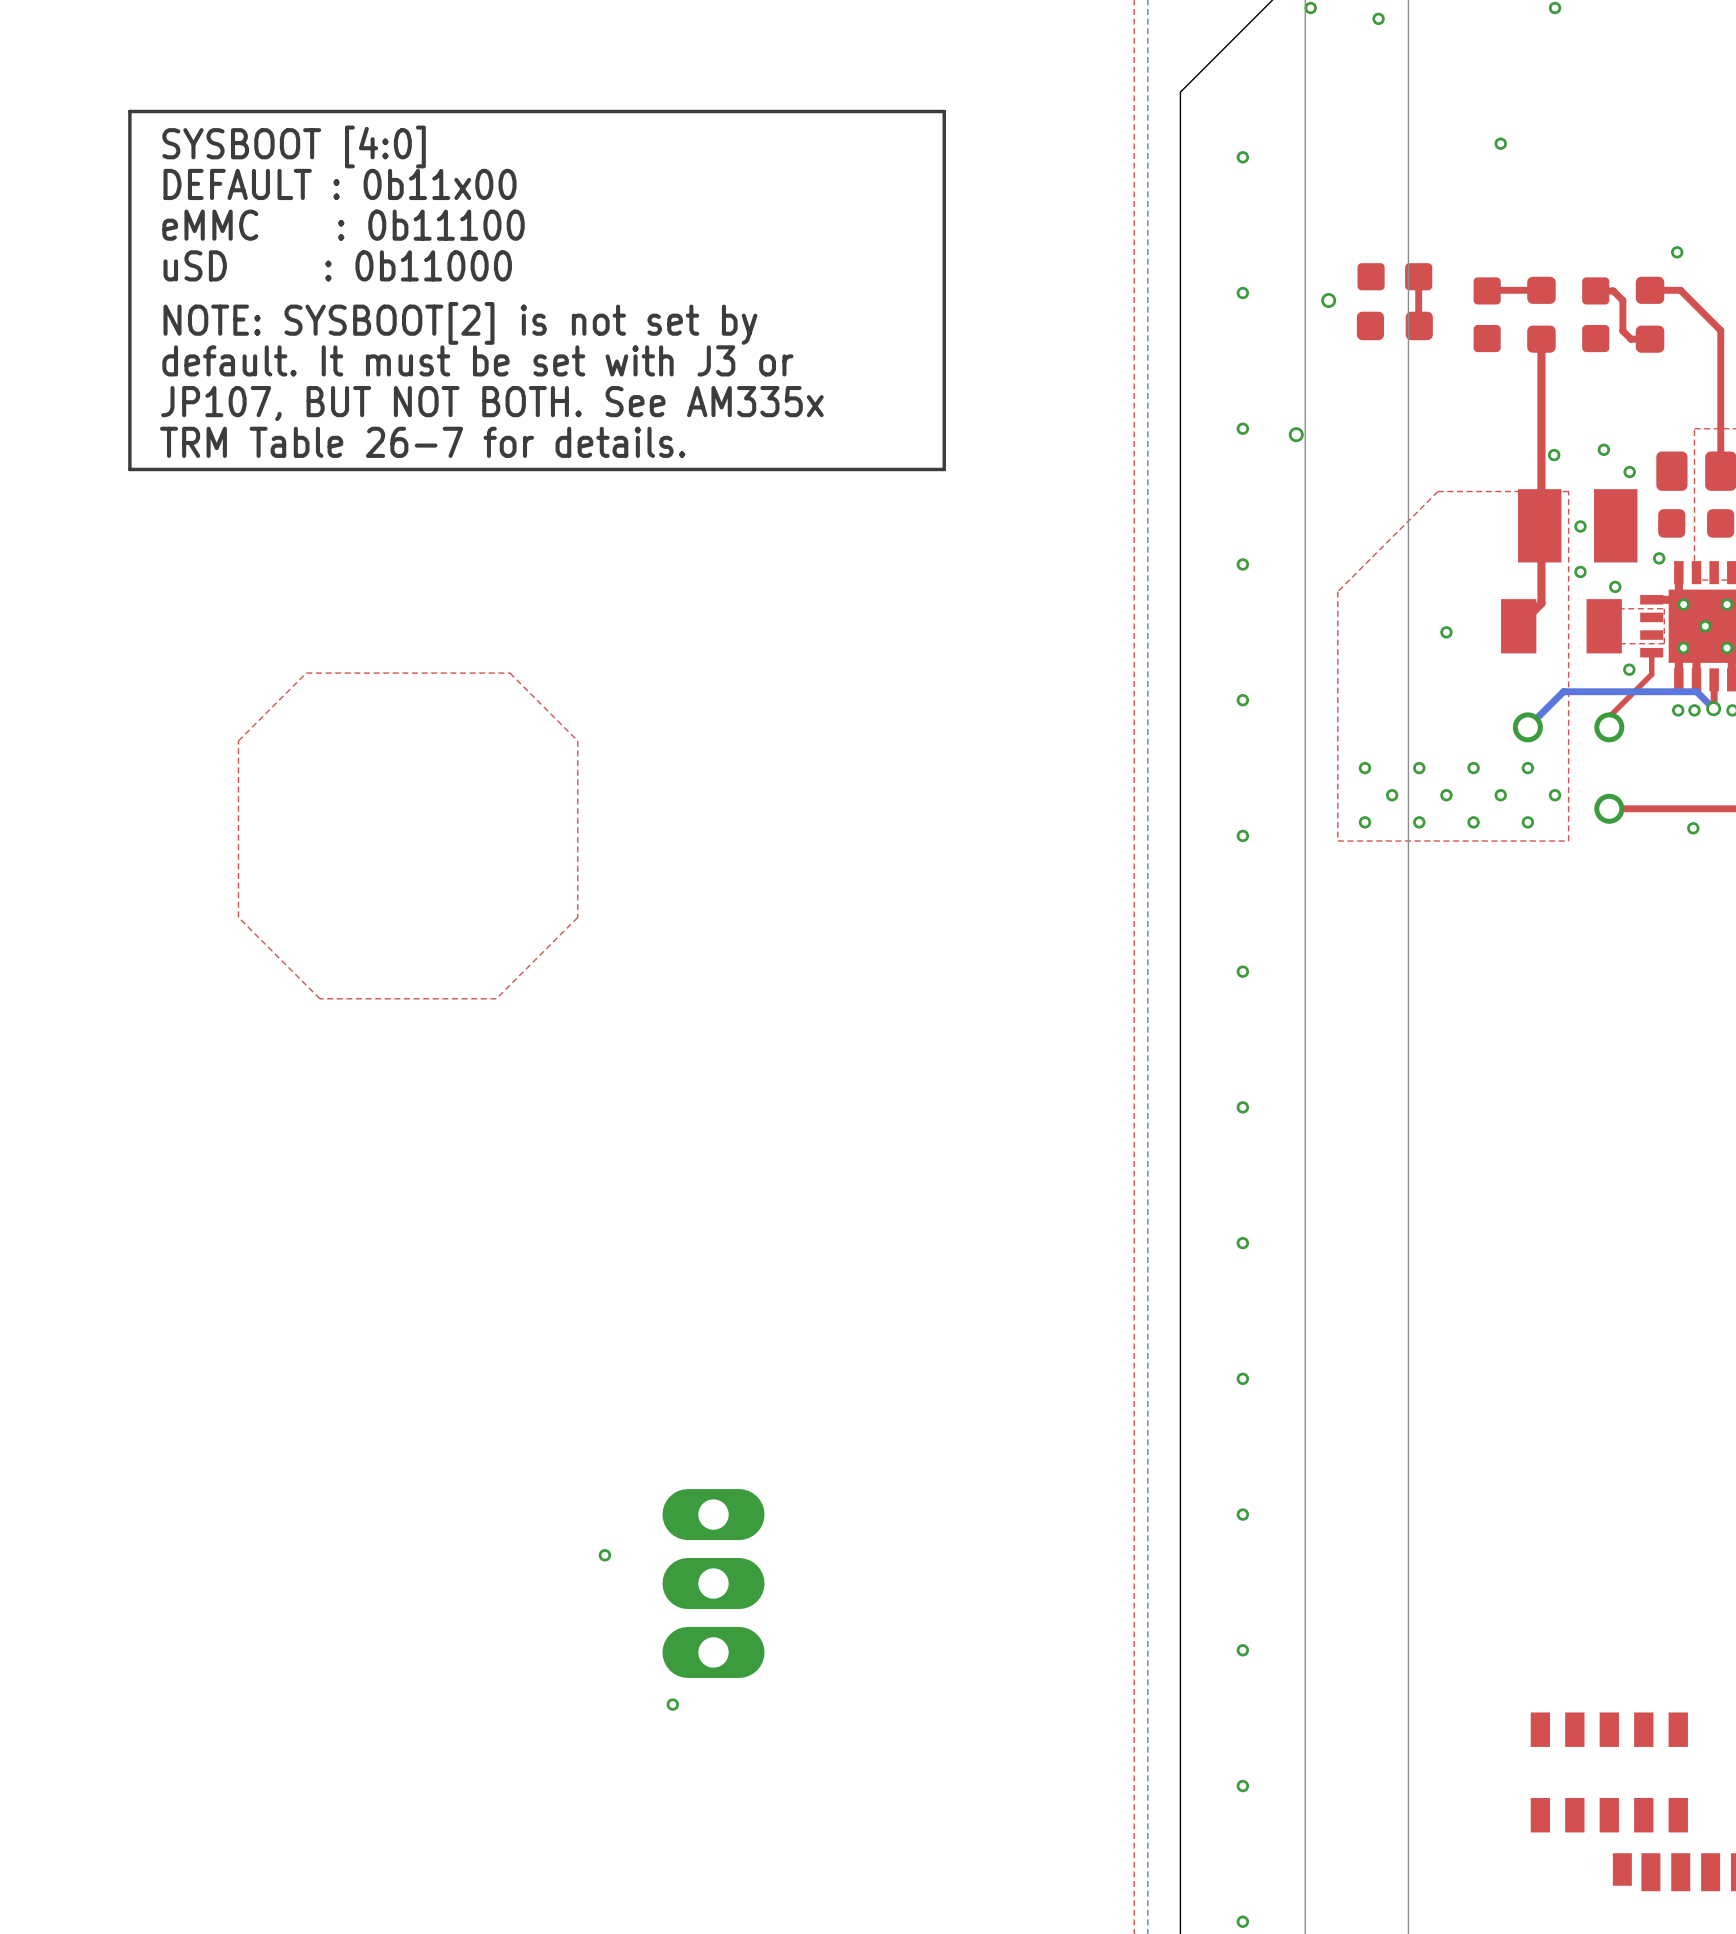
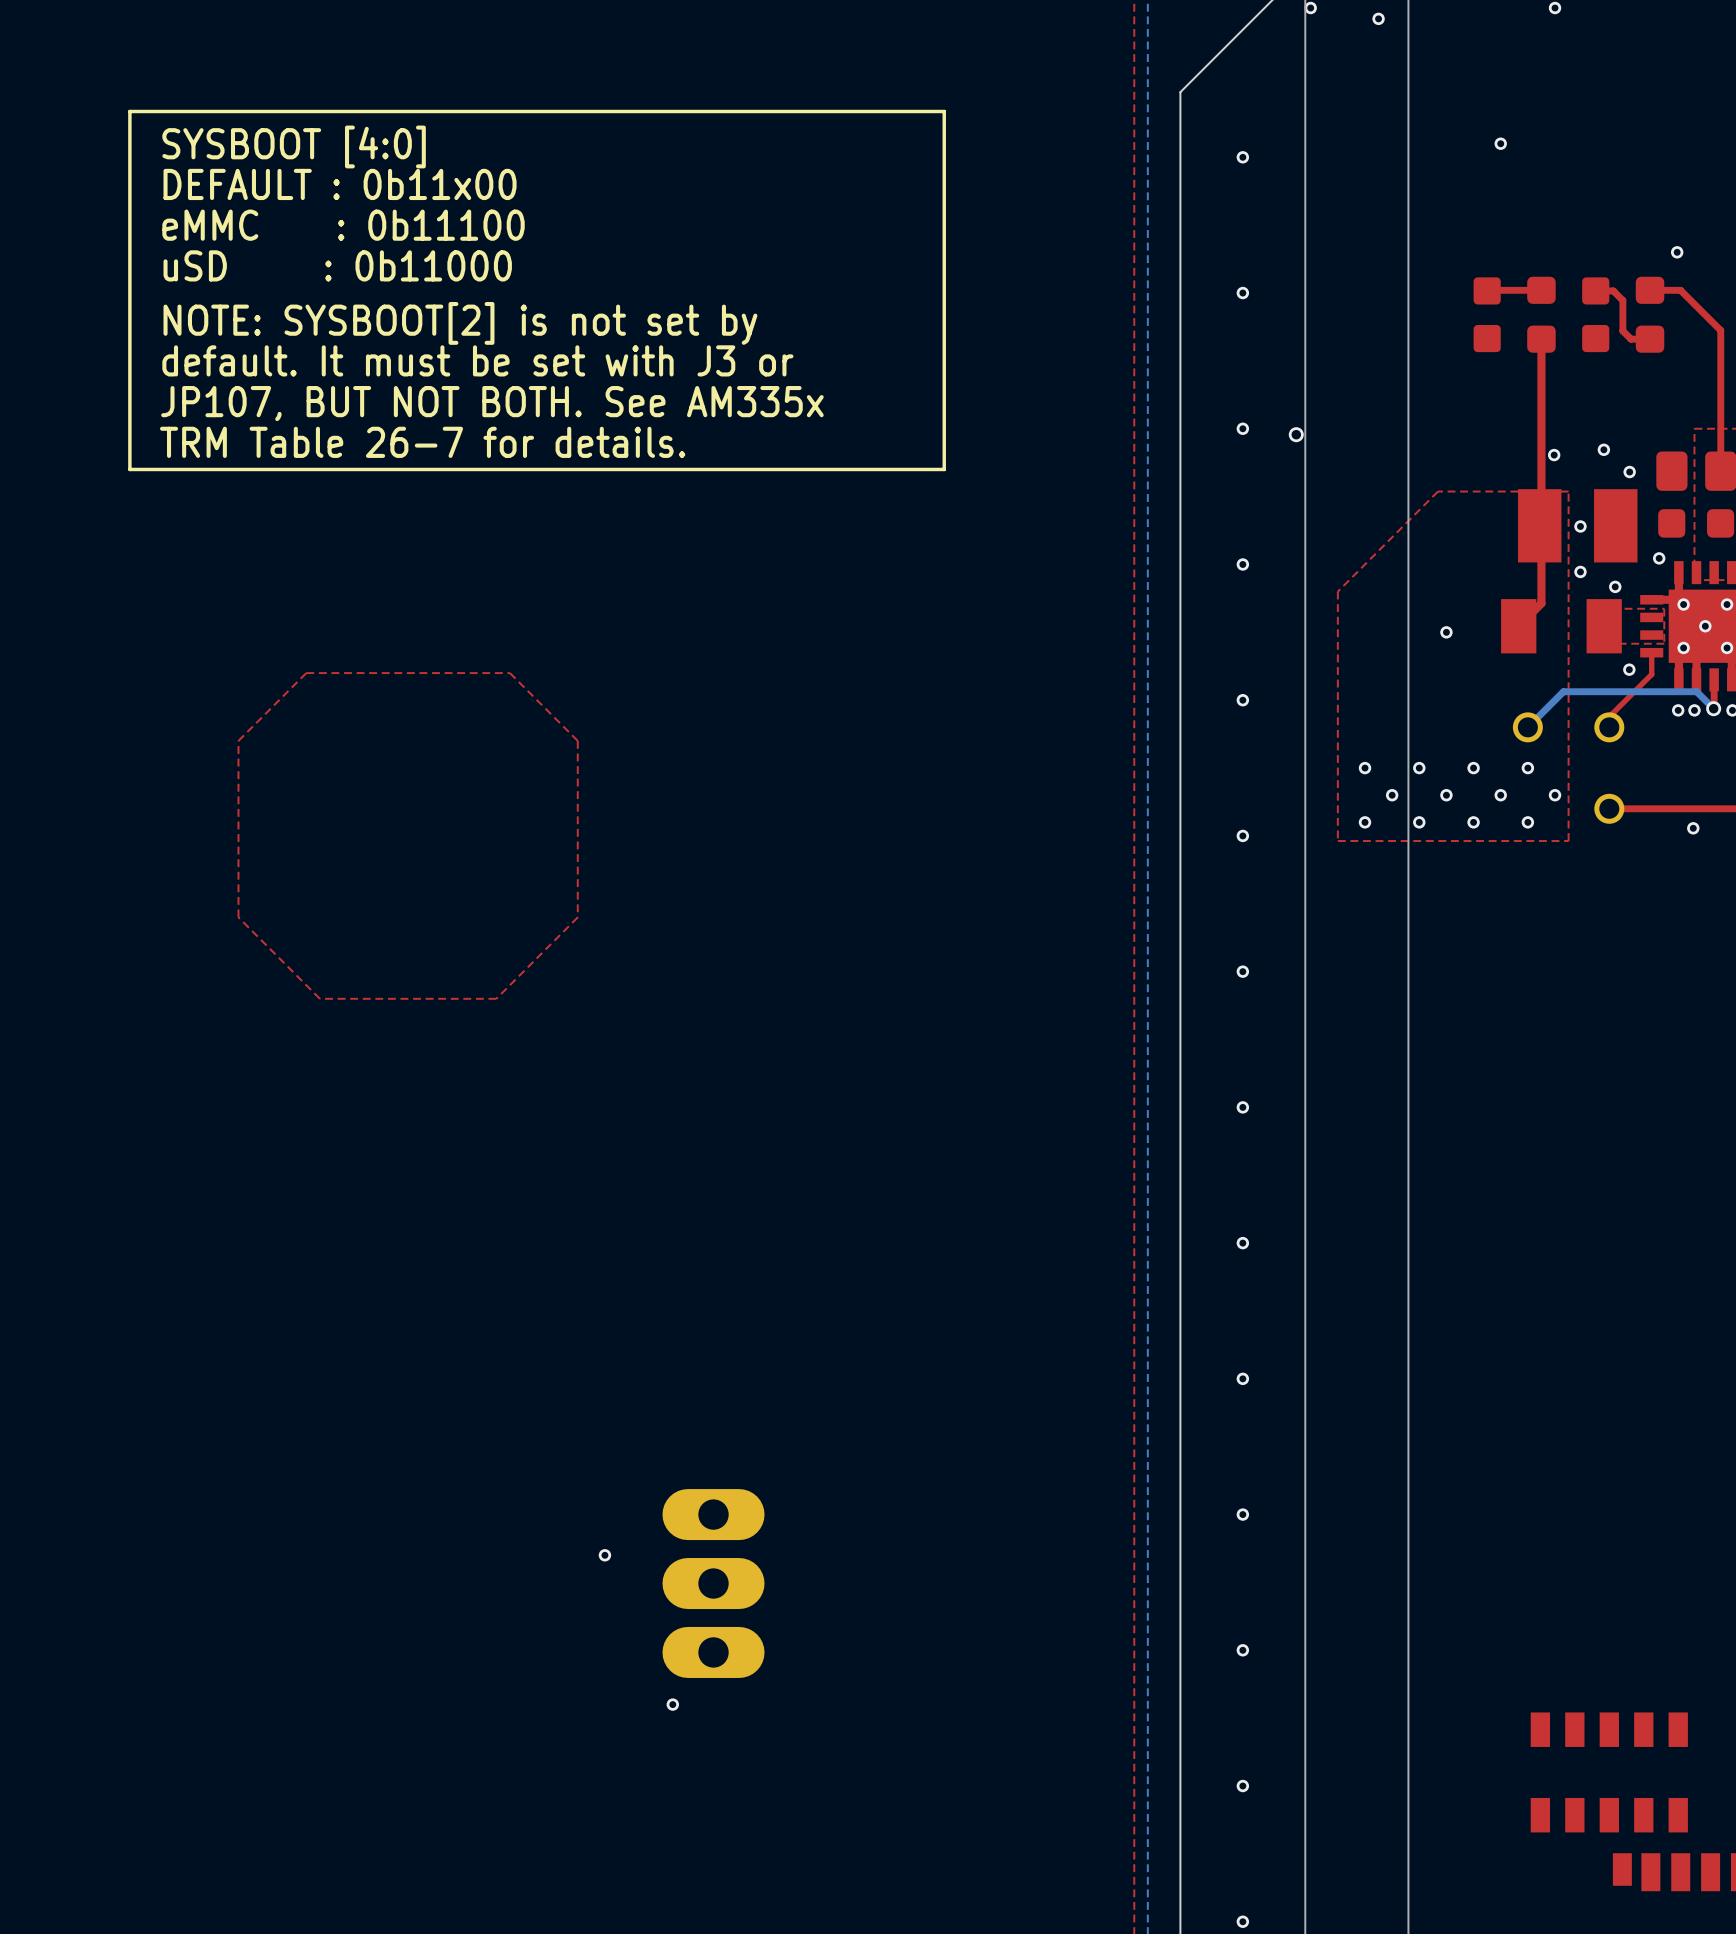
part: (1394, 276) -> none
top track: (1418, 276) (1419, 325) -> none
via: (1328, 300) -> none
part: (1394, 325) -> none

